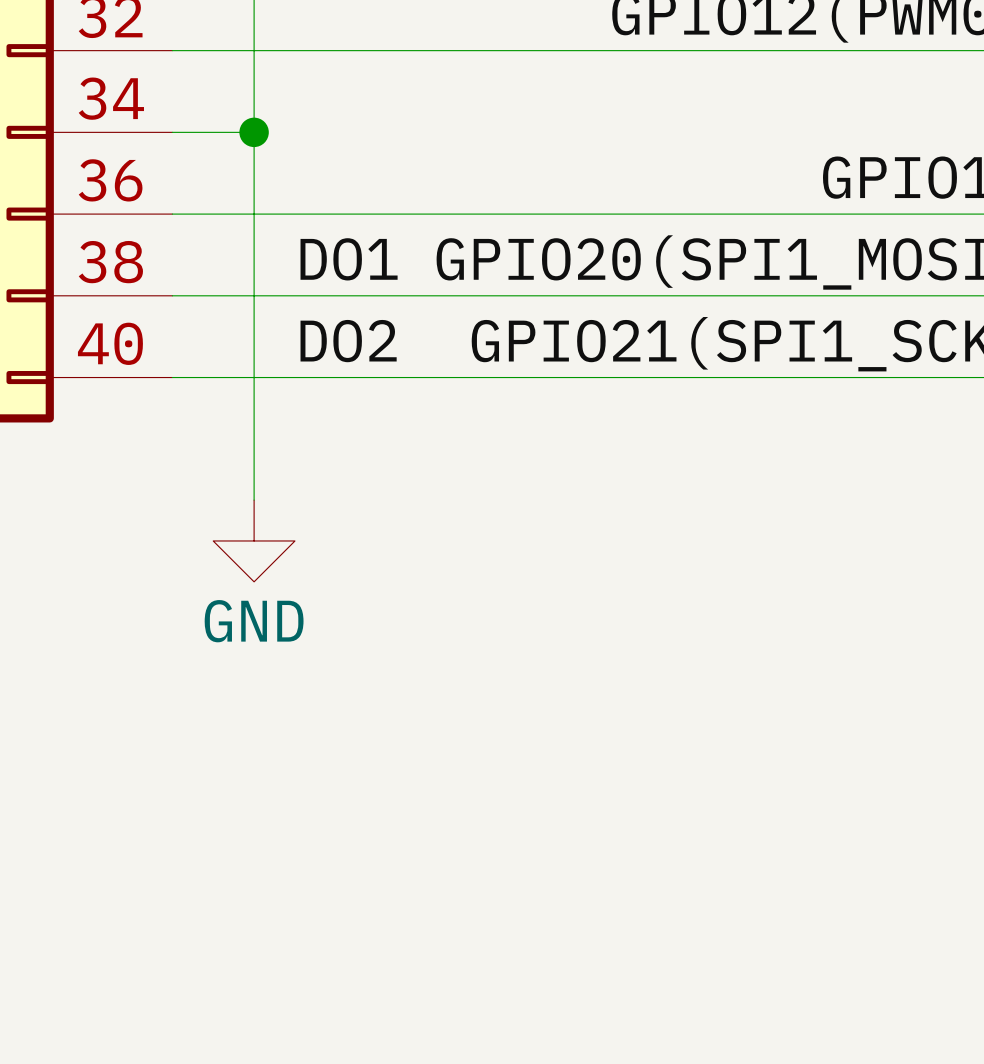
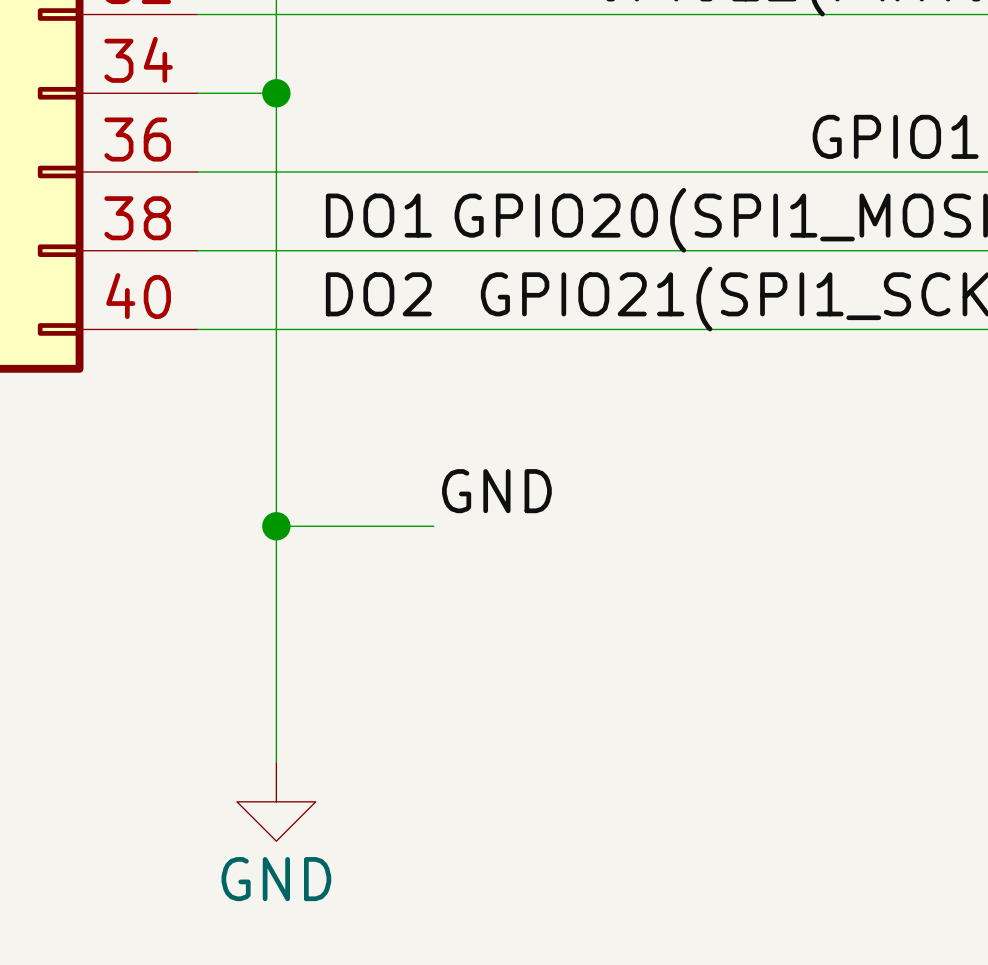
wire: none -> (276, 447) (276, 762)
power symbol position: GND (254, 540) -> GND (276, 801)
label: none -> GND (496, 491)
wire: none -> (276, 526) (433, 526)
junction: none -> (276, 526)

